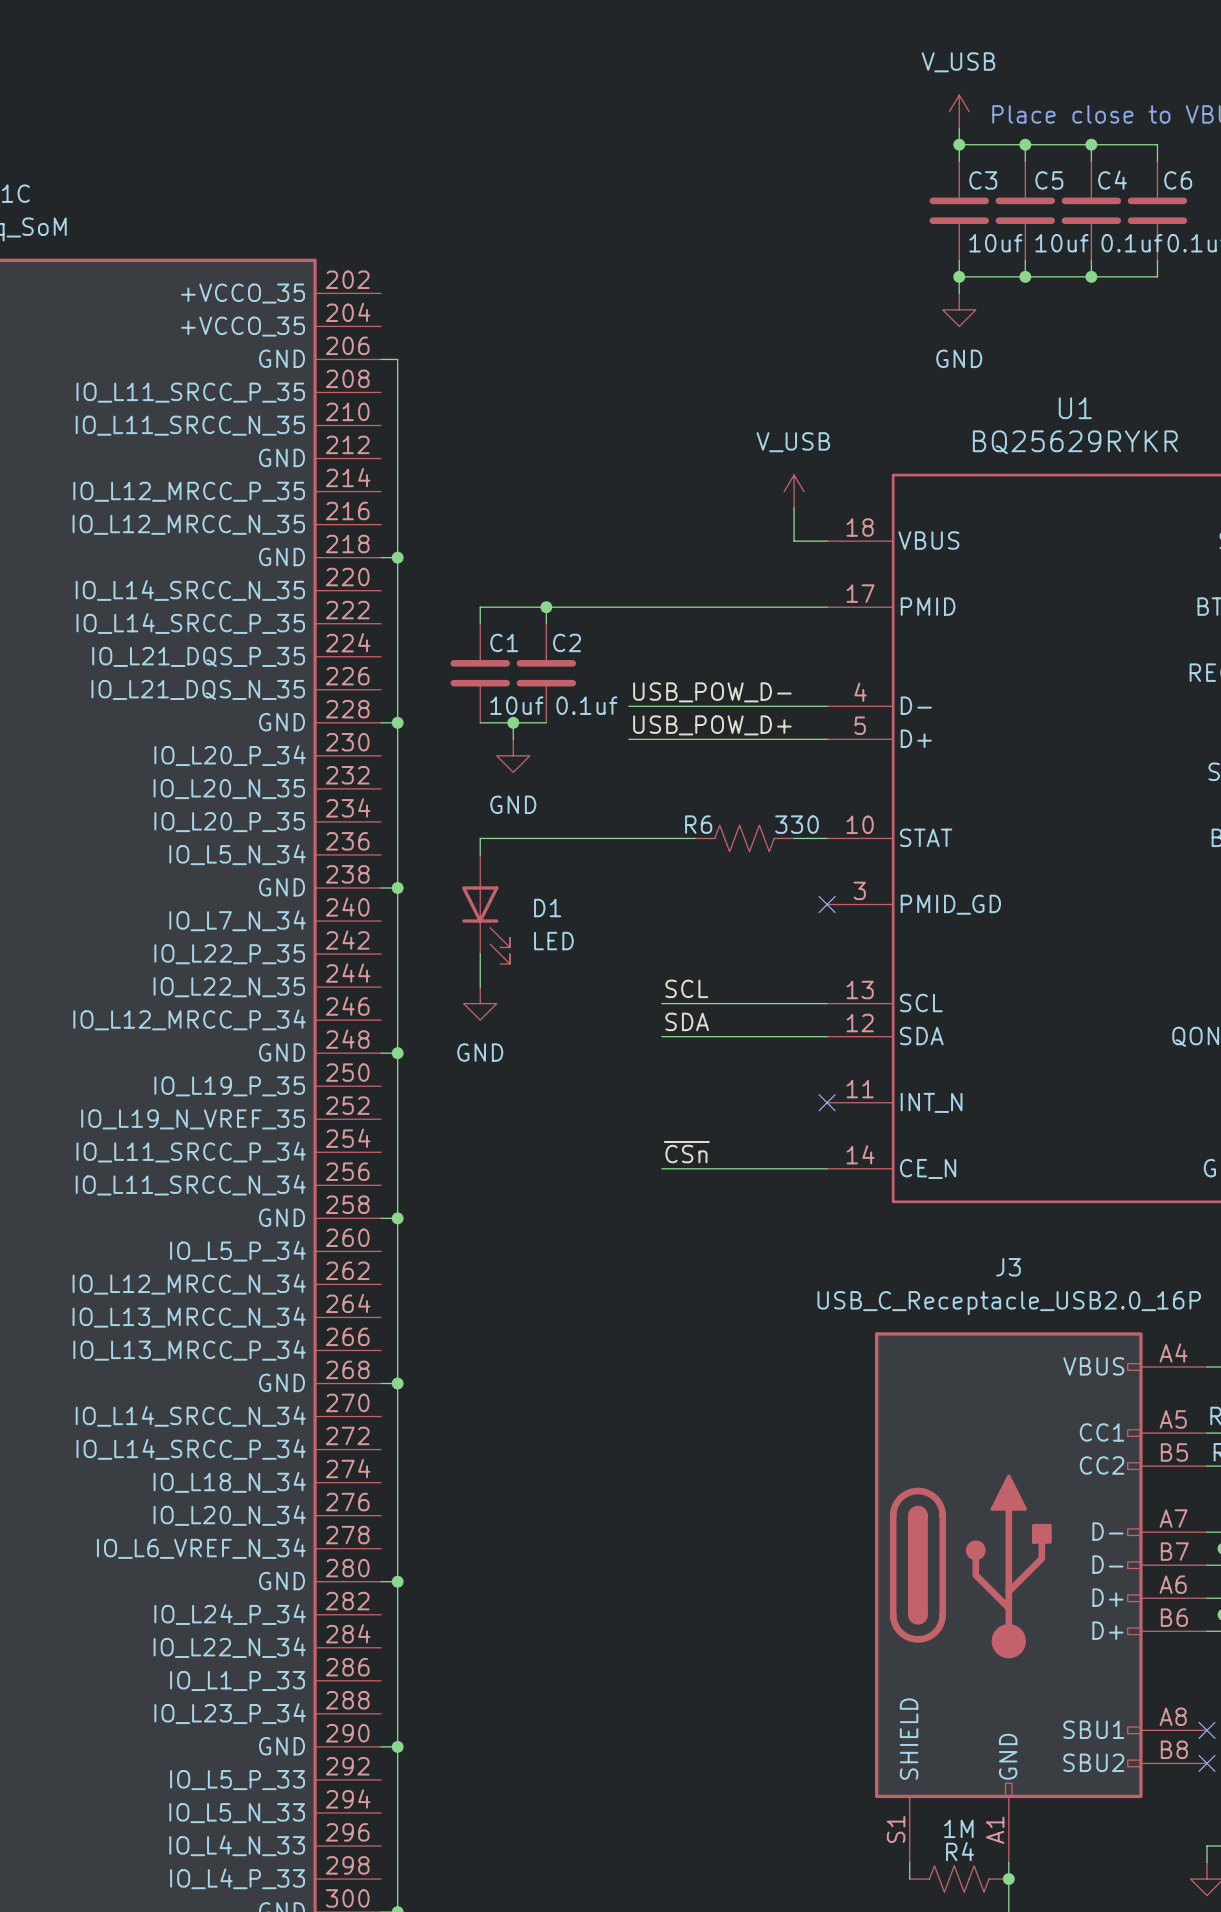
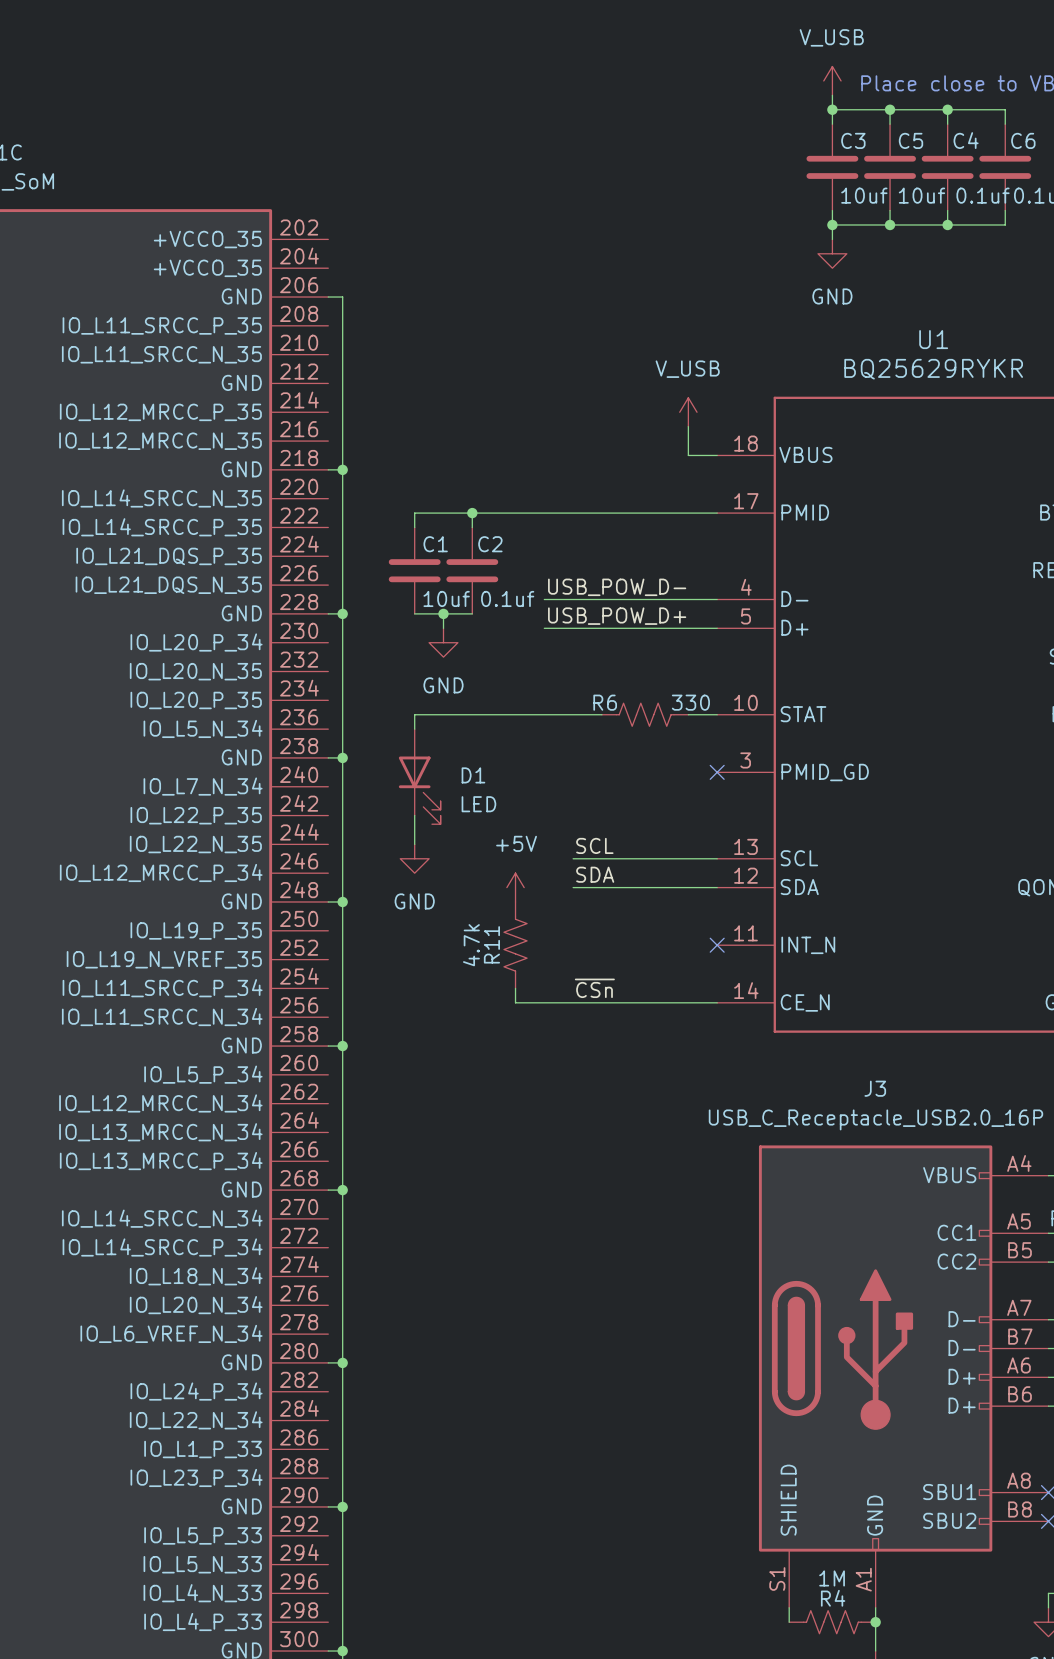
power symbol: none -> +5V (515, 887)
R11: none -> 4.7k (515, 945)
wire: none -> (515, 988) (515, 1002) (573, 1002)

